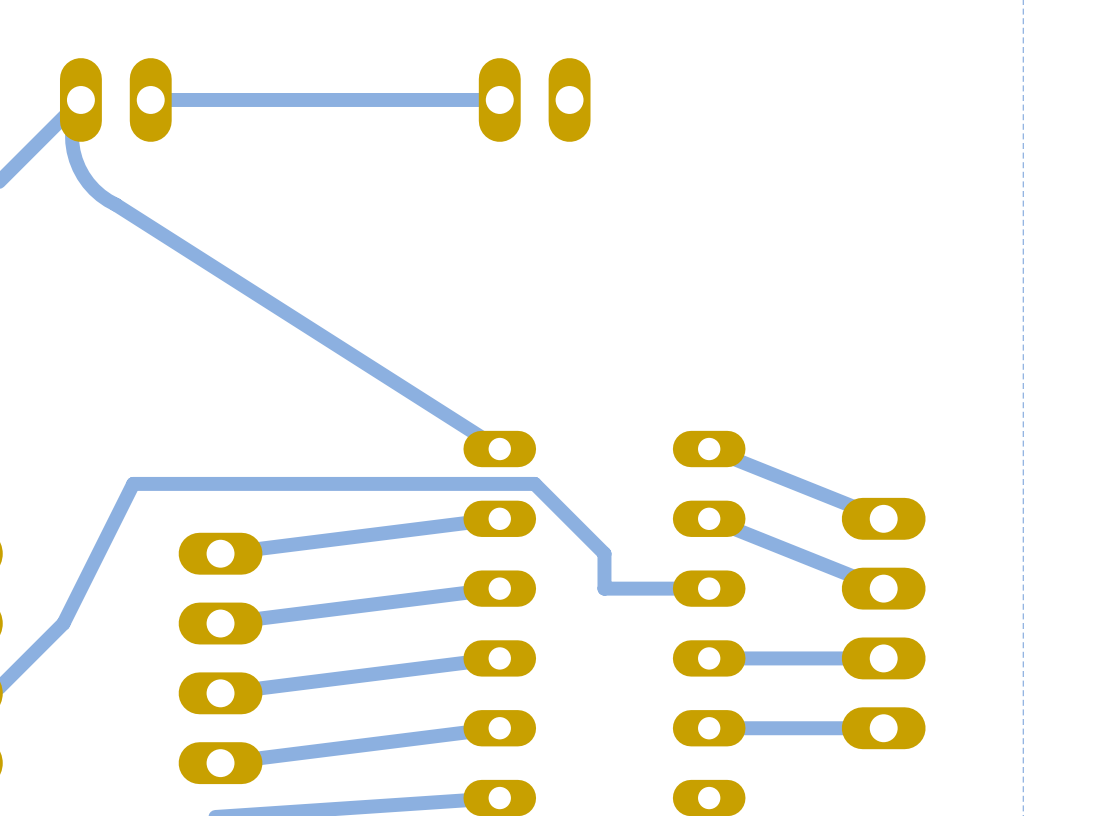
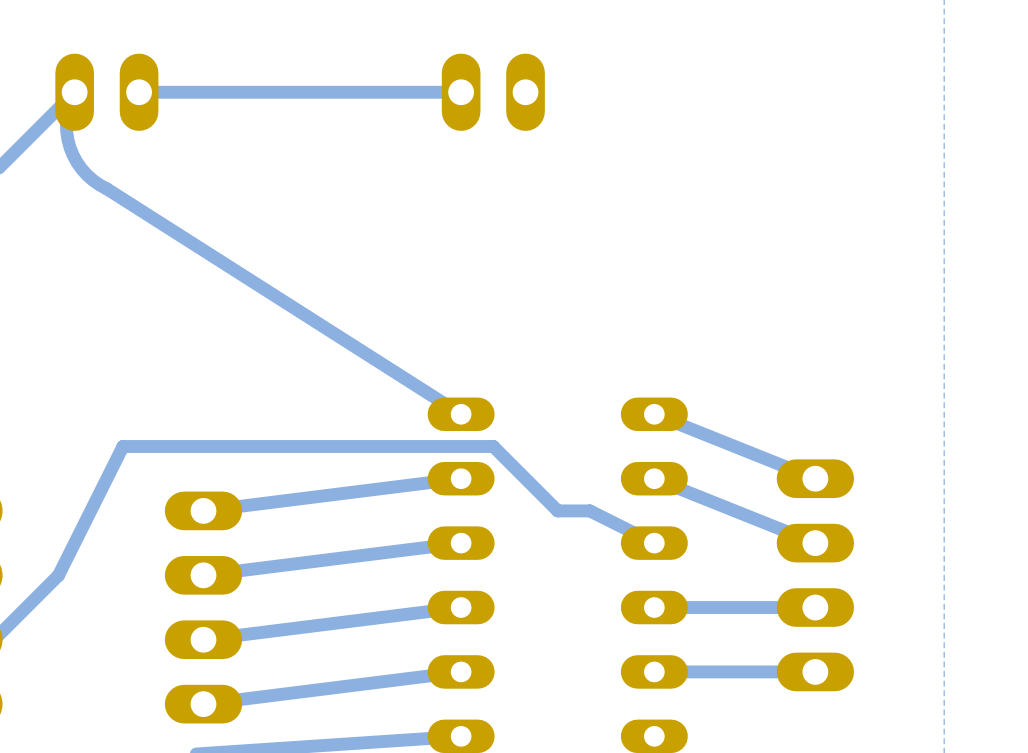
track: (604, 553) (604, 588) (709, 588) -> (557, 510) (589, 510) (654, 543)

